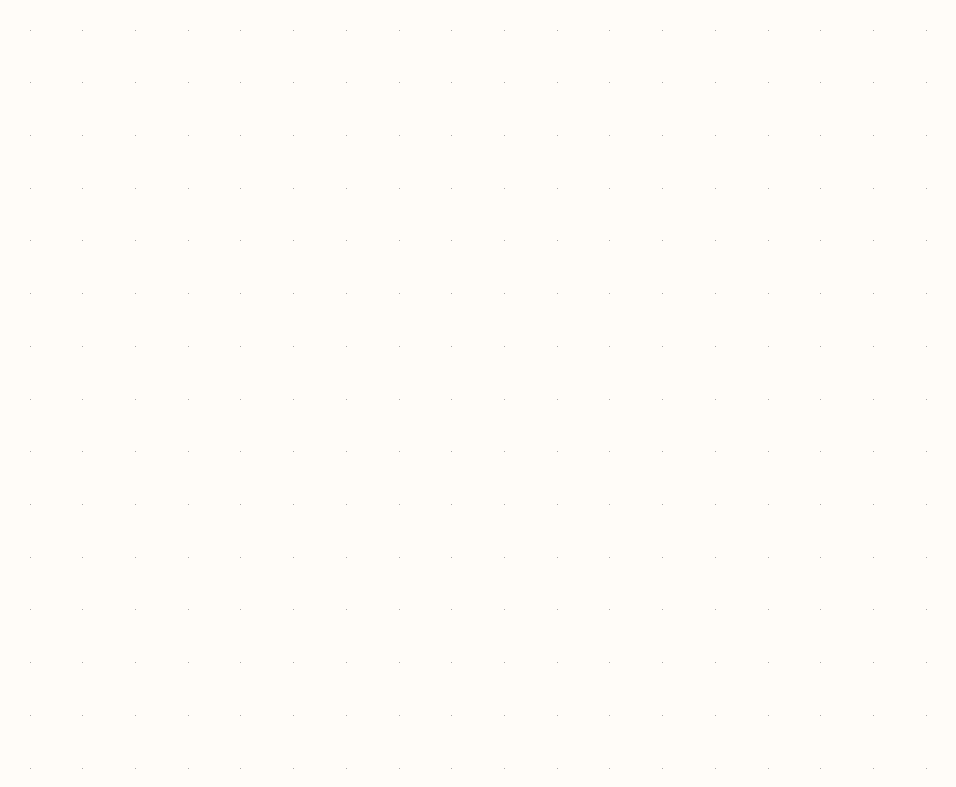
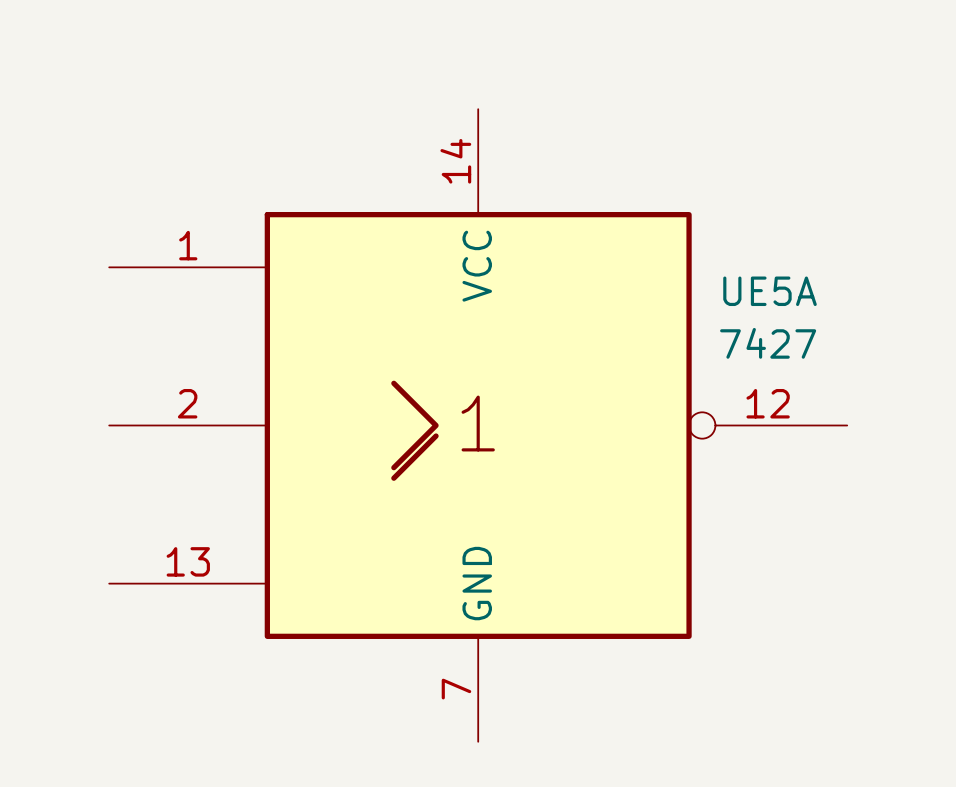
UE5A: none -> 7427 (478, 425)

